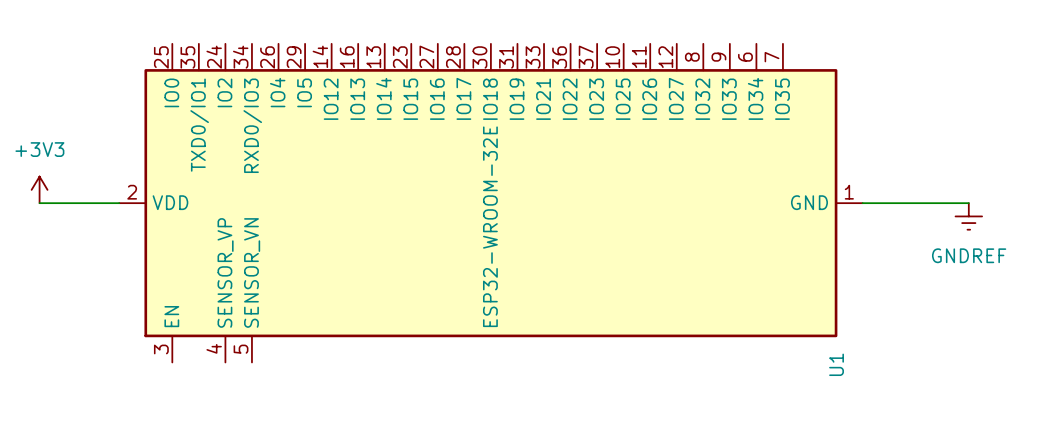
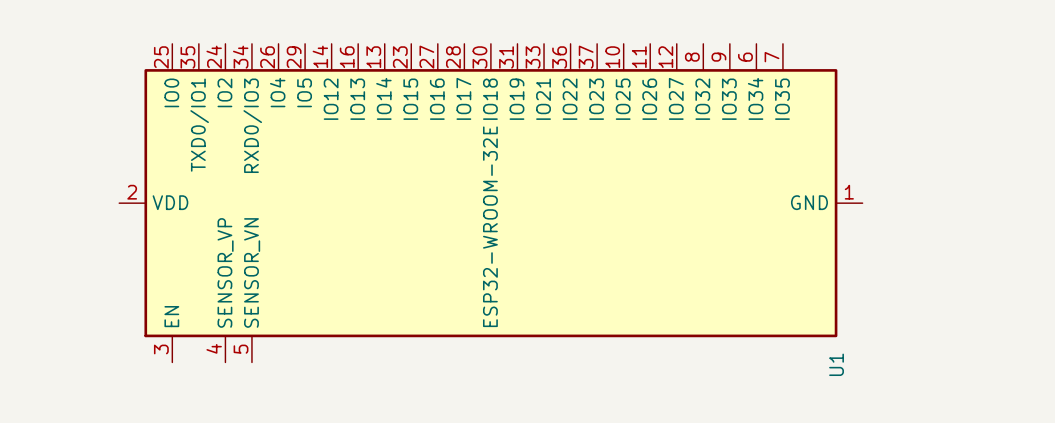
power symbol: +3V3 (39, 189) -> none
wire: (39, 203) (119, 203) -> none
wire: (862, 203) (968, 203) -> none
power symbol: GNDREF (968, 216) -> none

